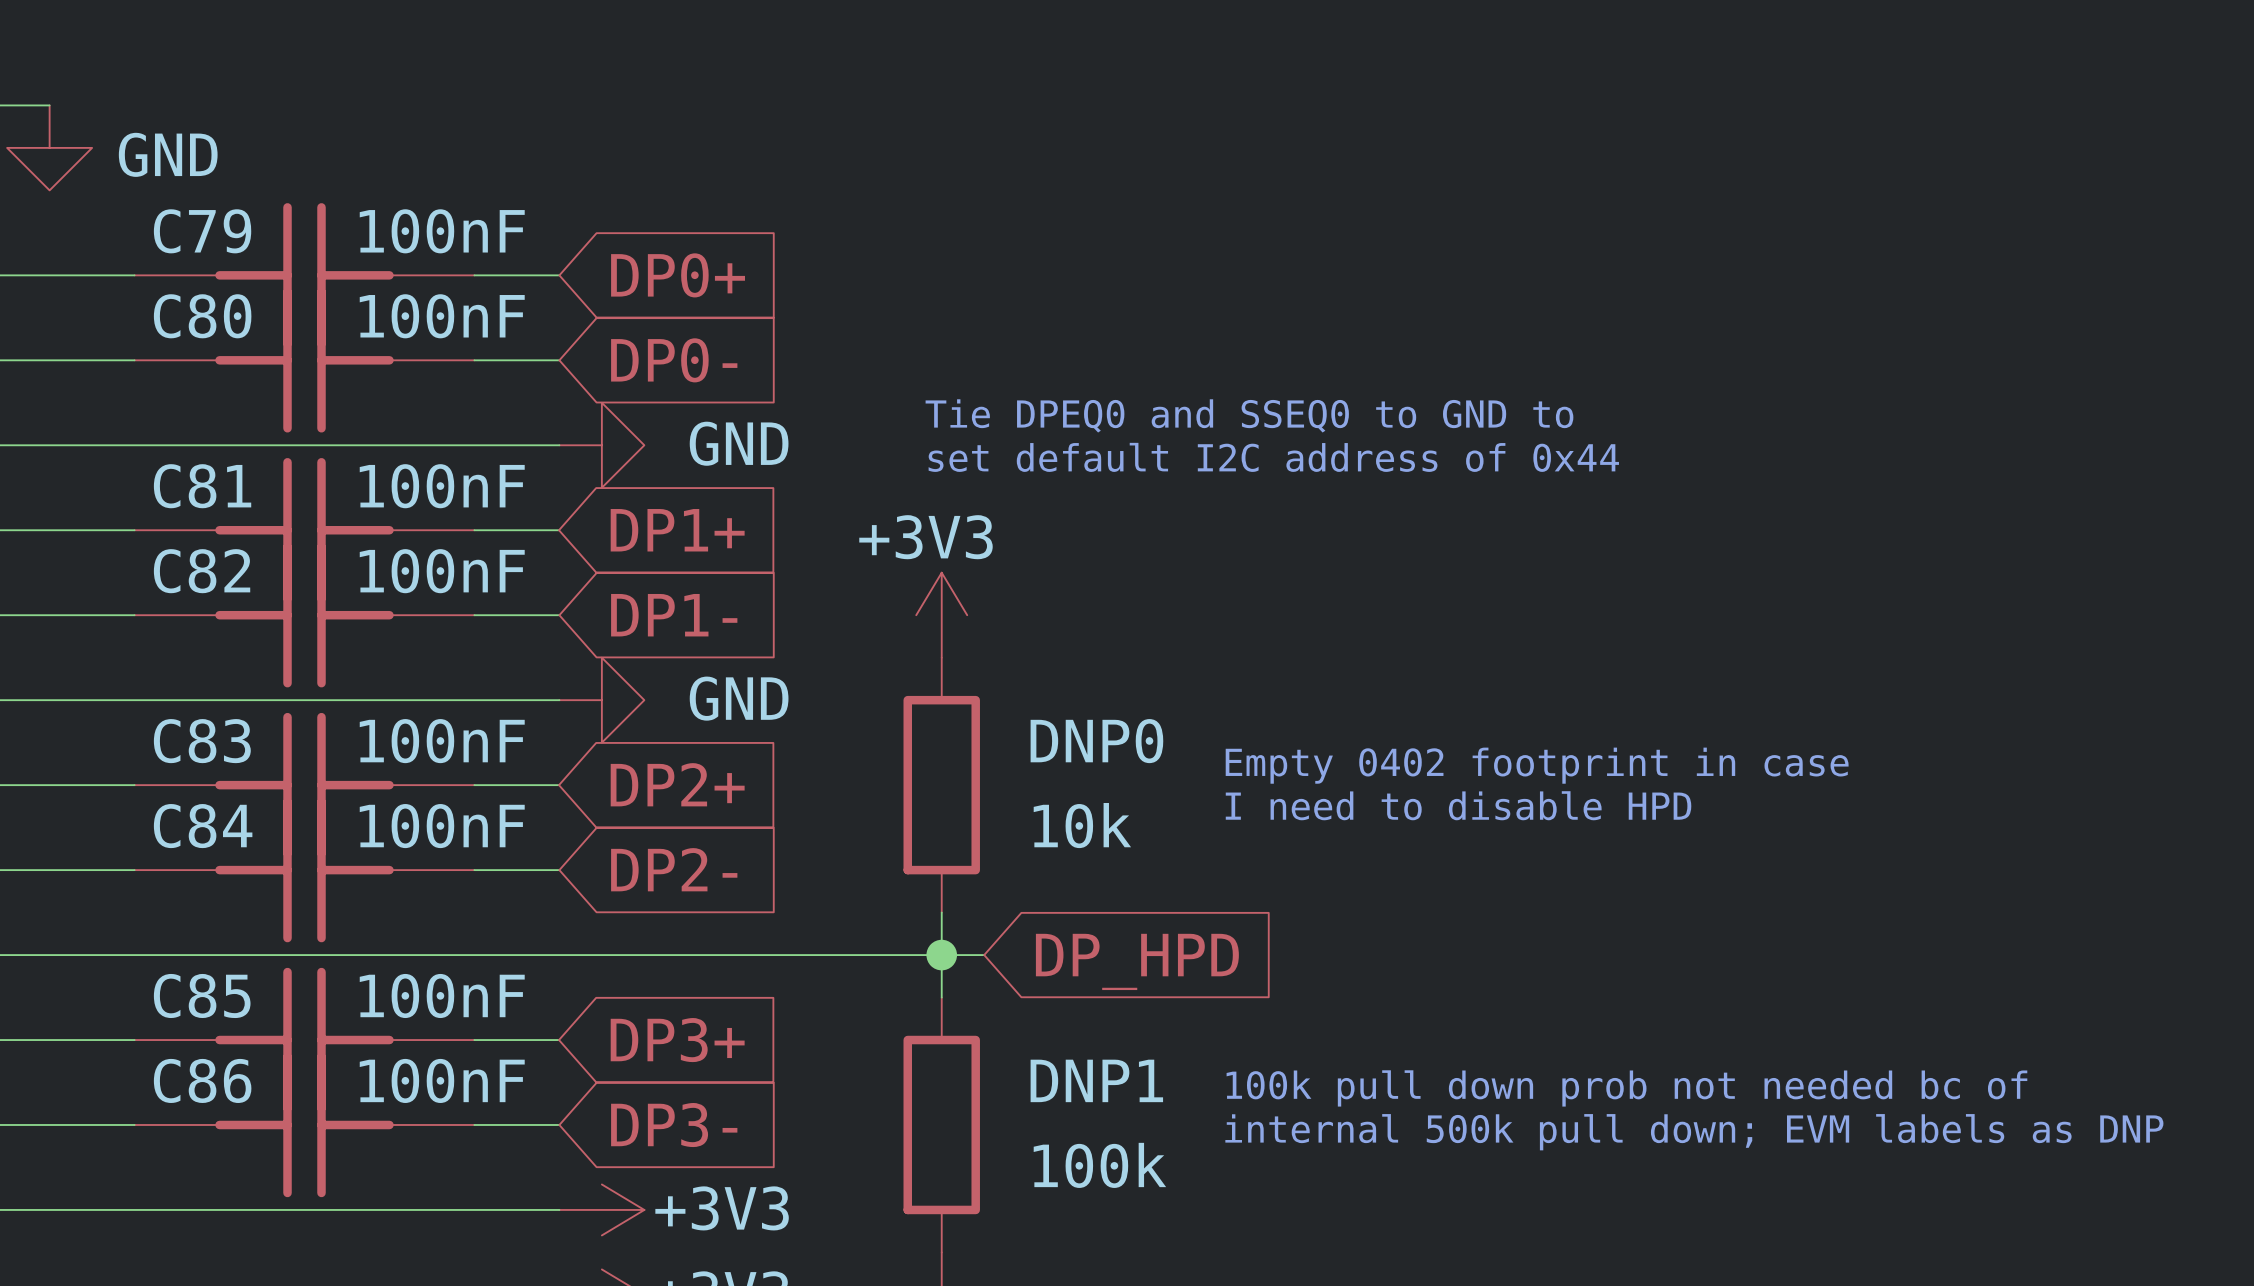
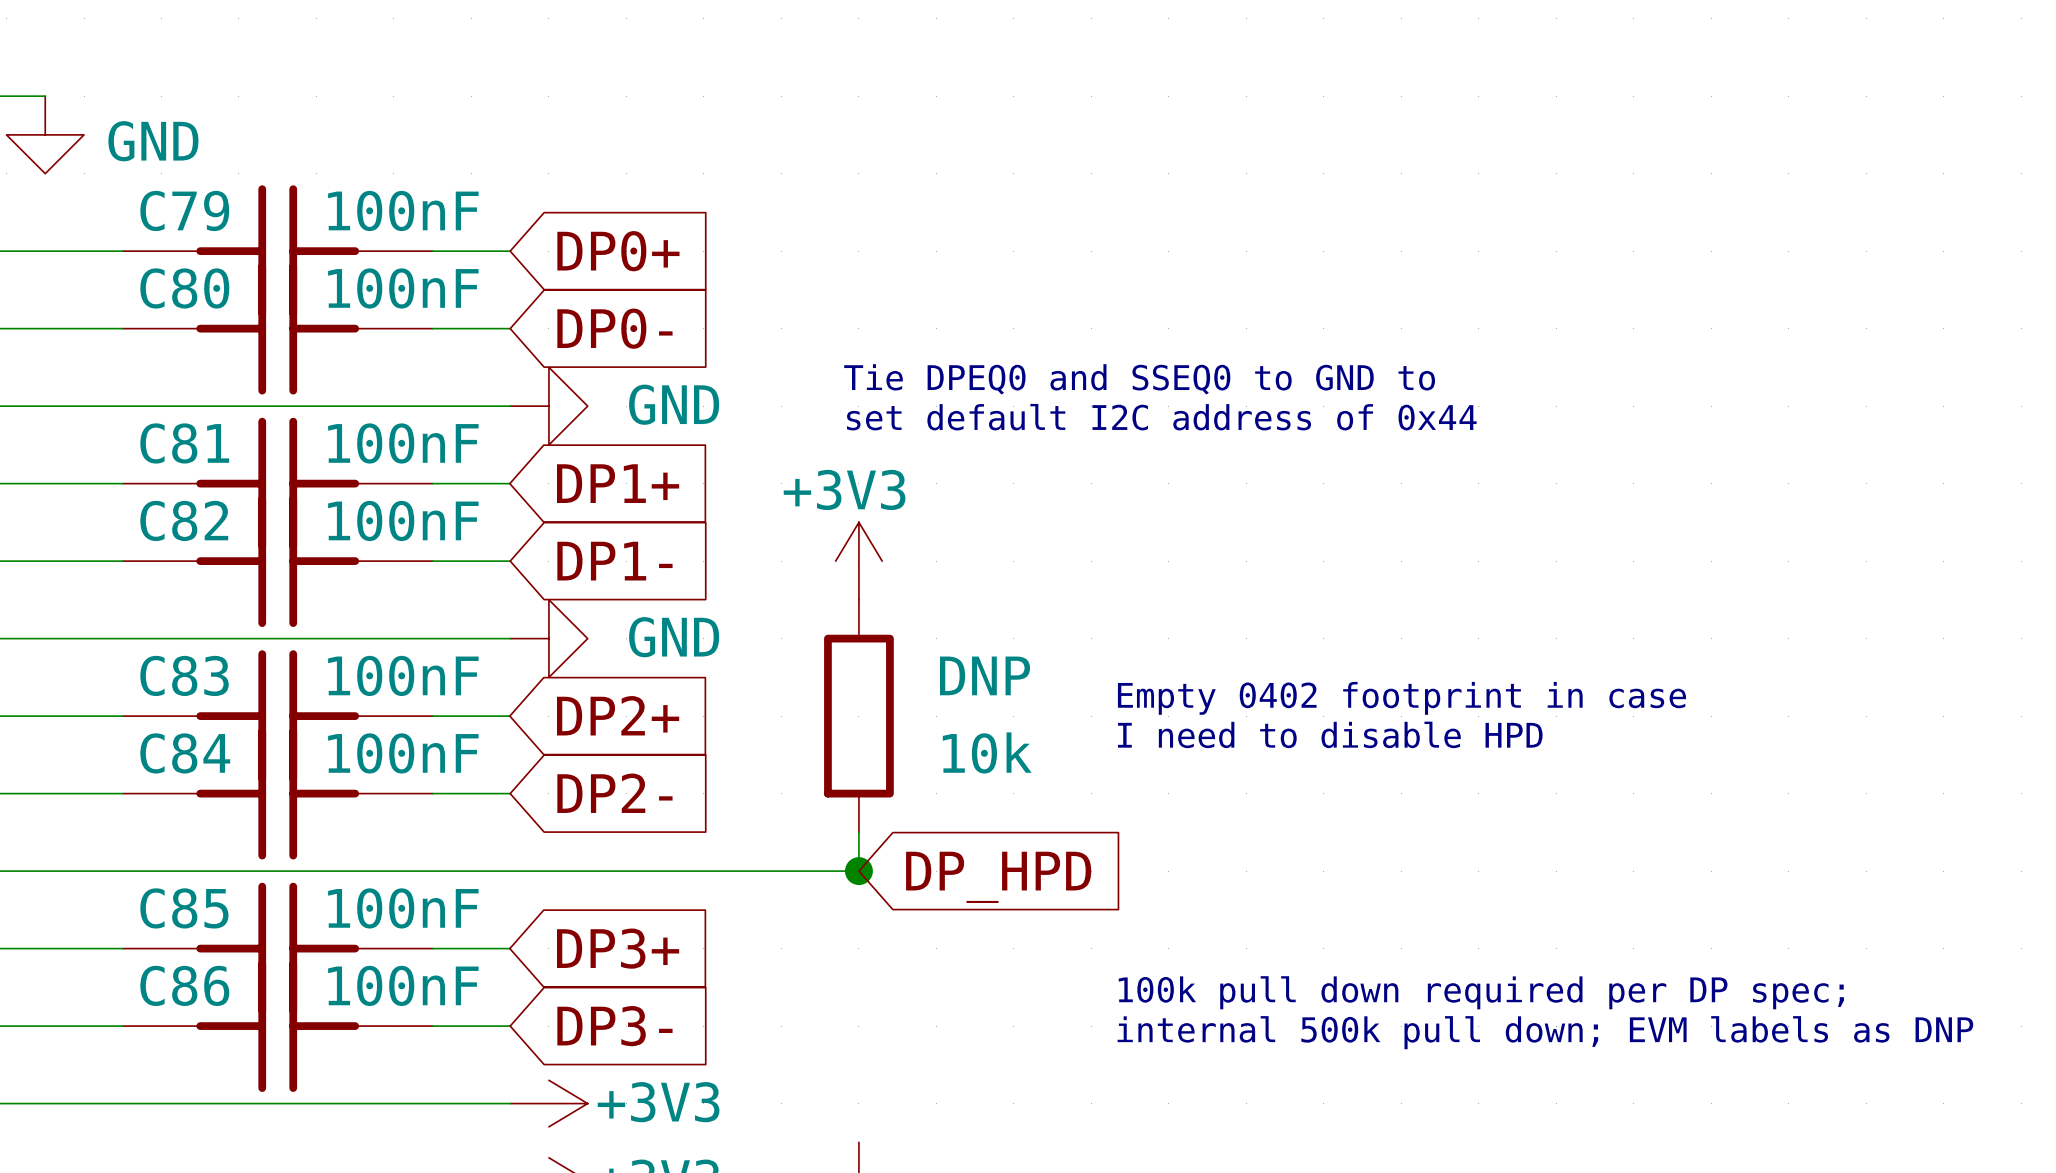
DNP0 name: DNP0 (1096, 741) -> DNP (985, 675)
wire: (984, 955) (941, 955) (941, 997) -> none
global label position: DP_HPD (1137, 961) -> DP_HPD (998, 877)
text: 100k pull down prob not needed bc of (1626, 1088) -> 100k pull down required per DP spec; (1481, 992)
DNP1: 100k (941, 1124) -> none

